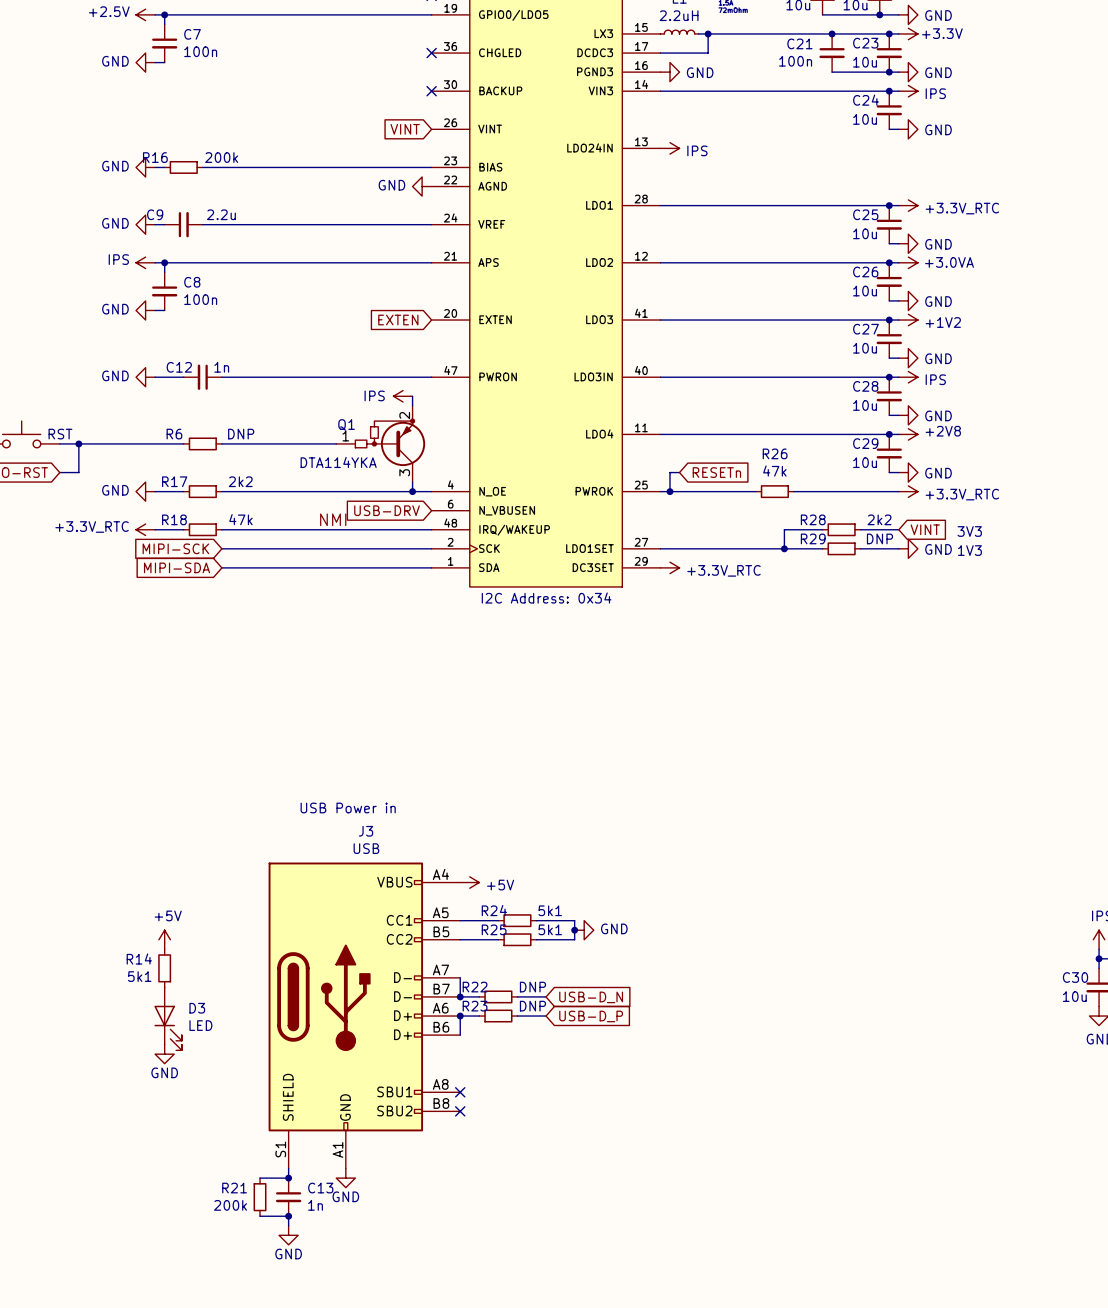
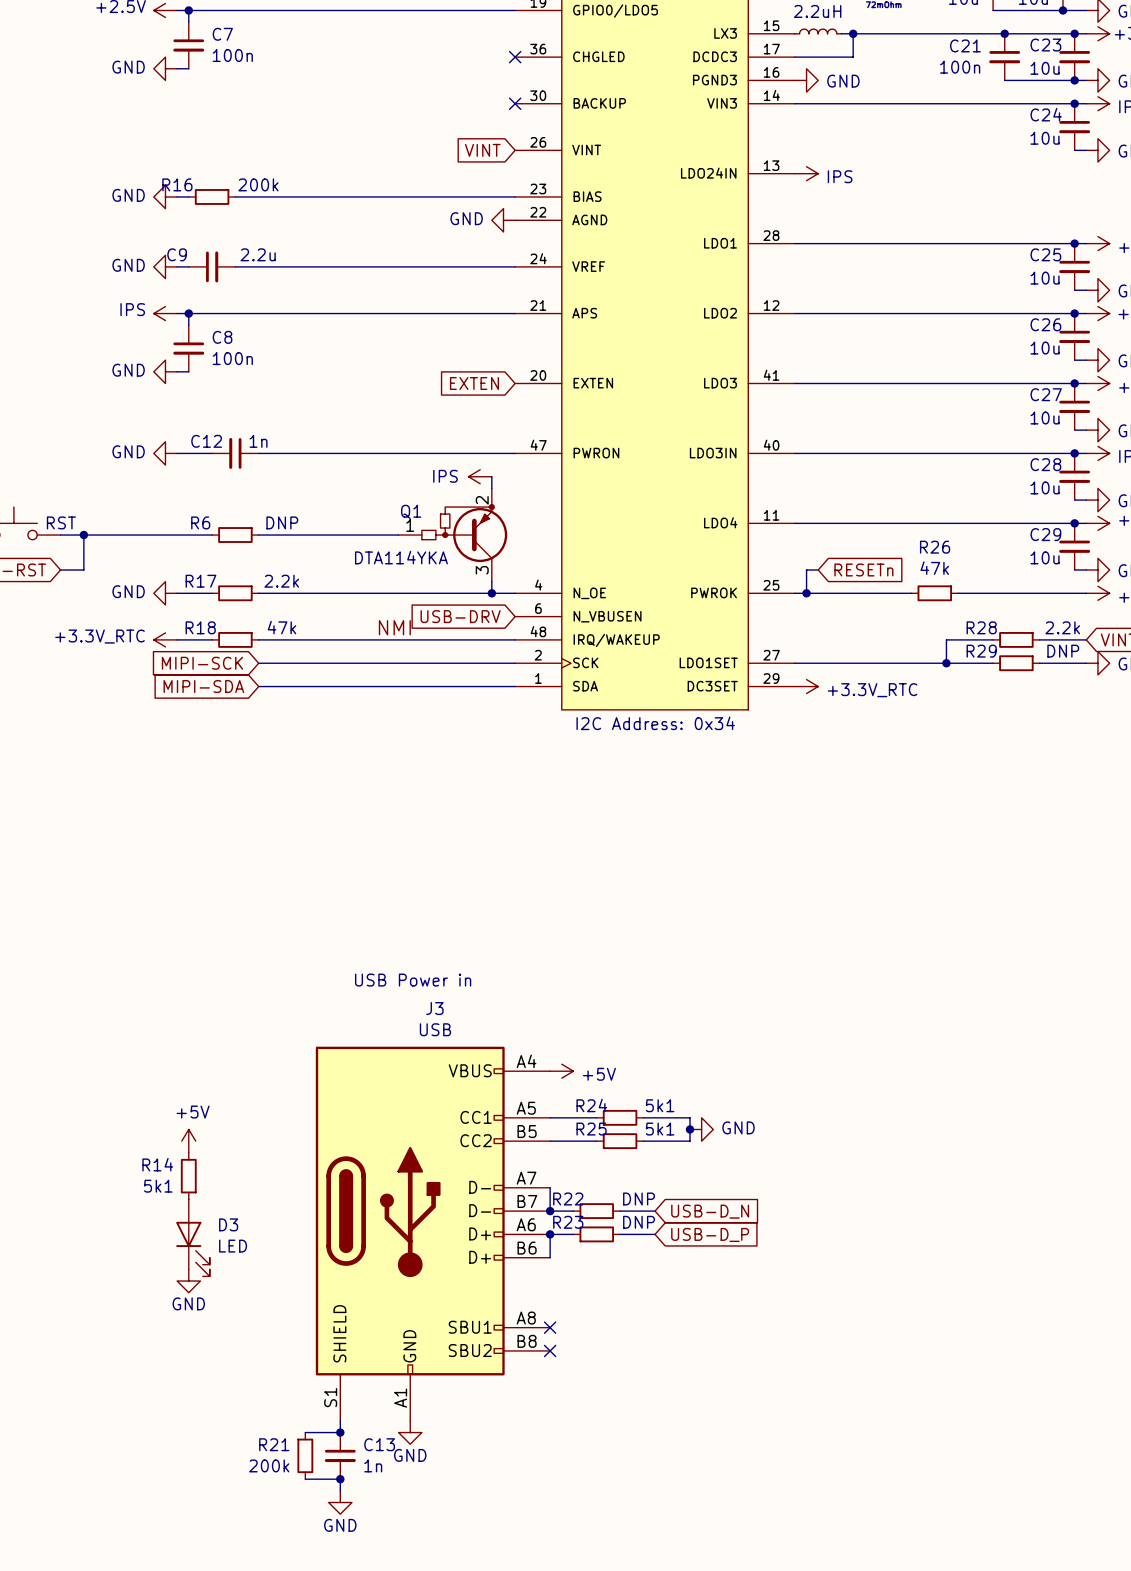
R17 value: 2k2 (240, 481) -> 2.2k (281, 581)
R28 value: 2k2 (879, 519) -> 2.2k (1062, 627)

